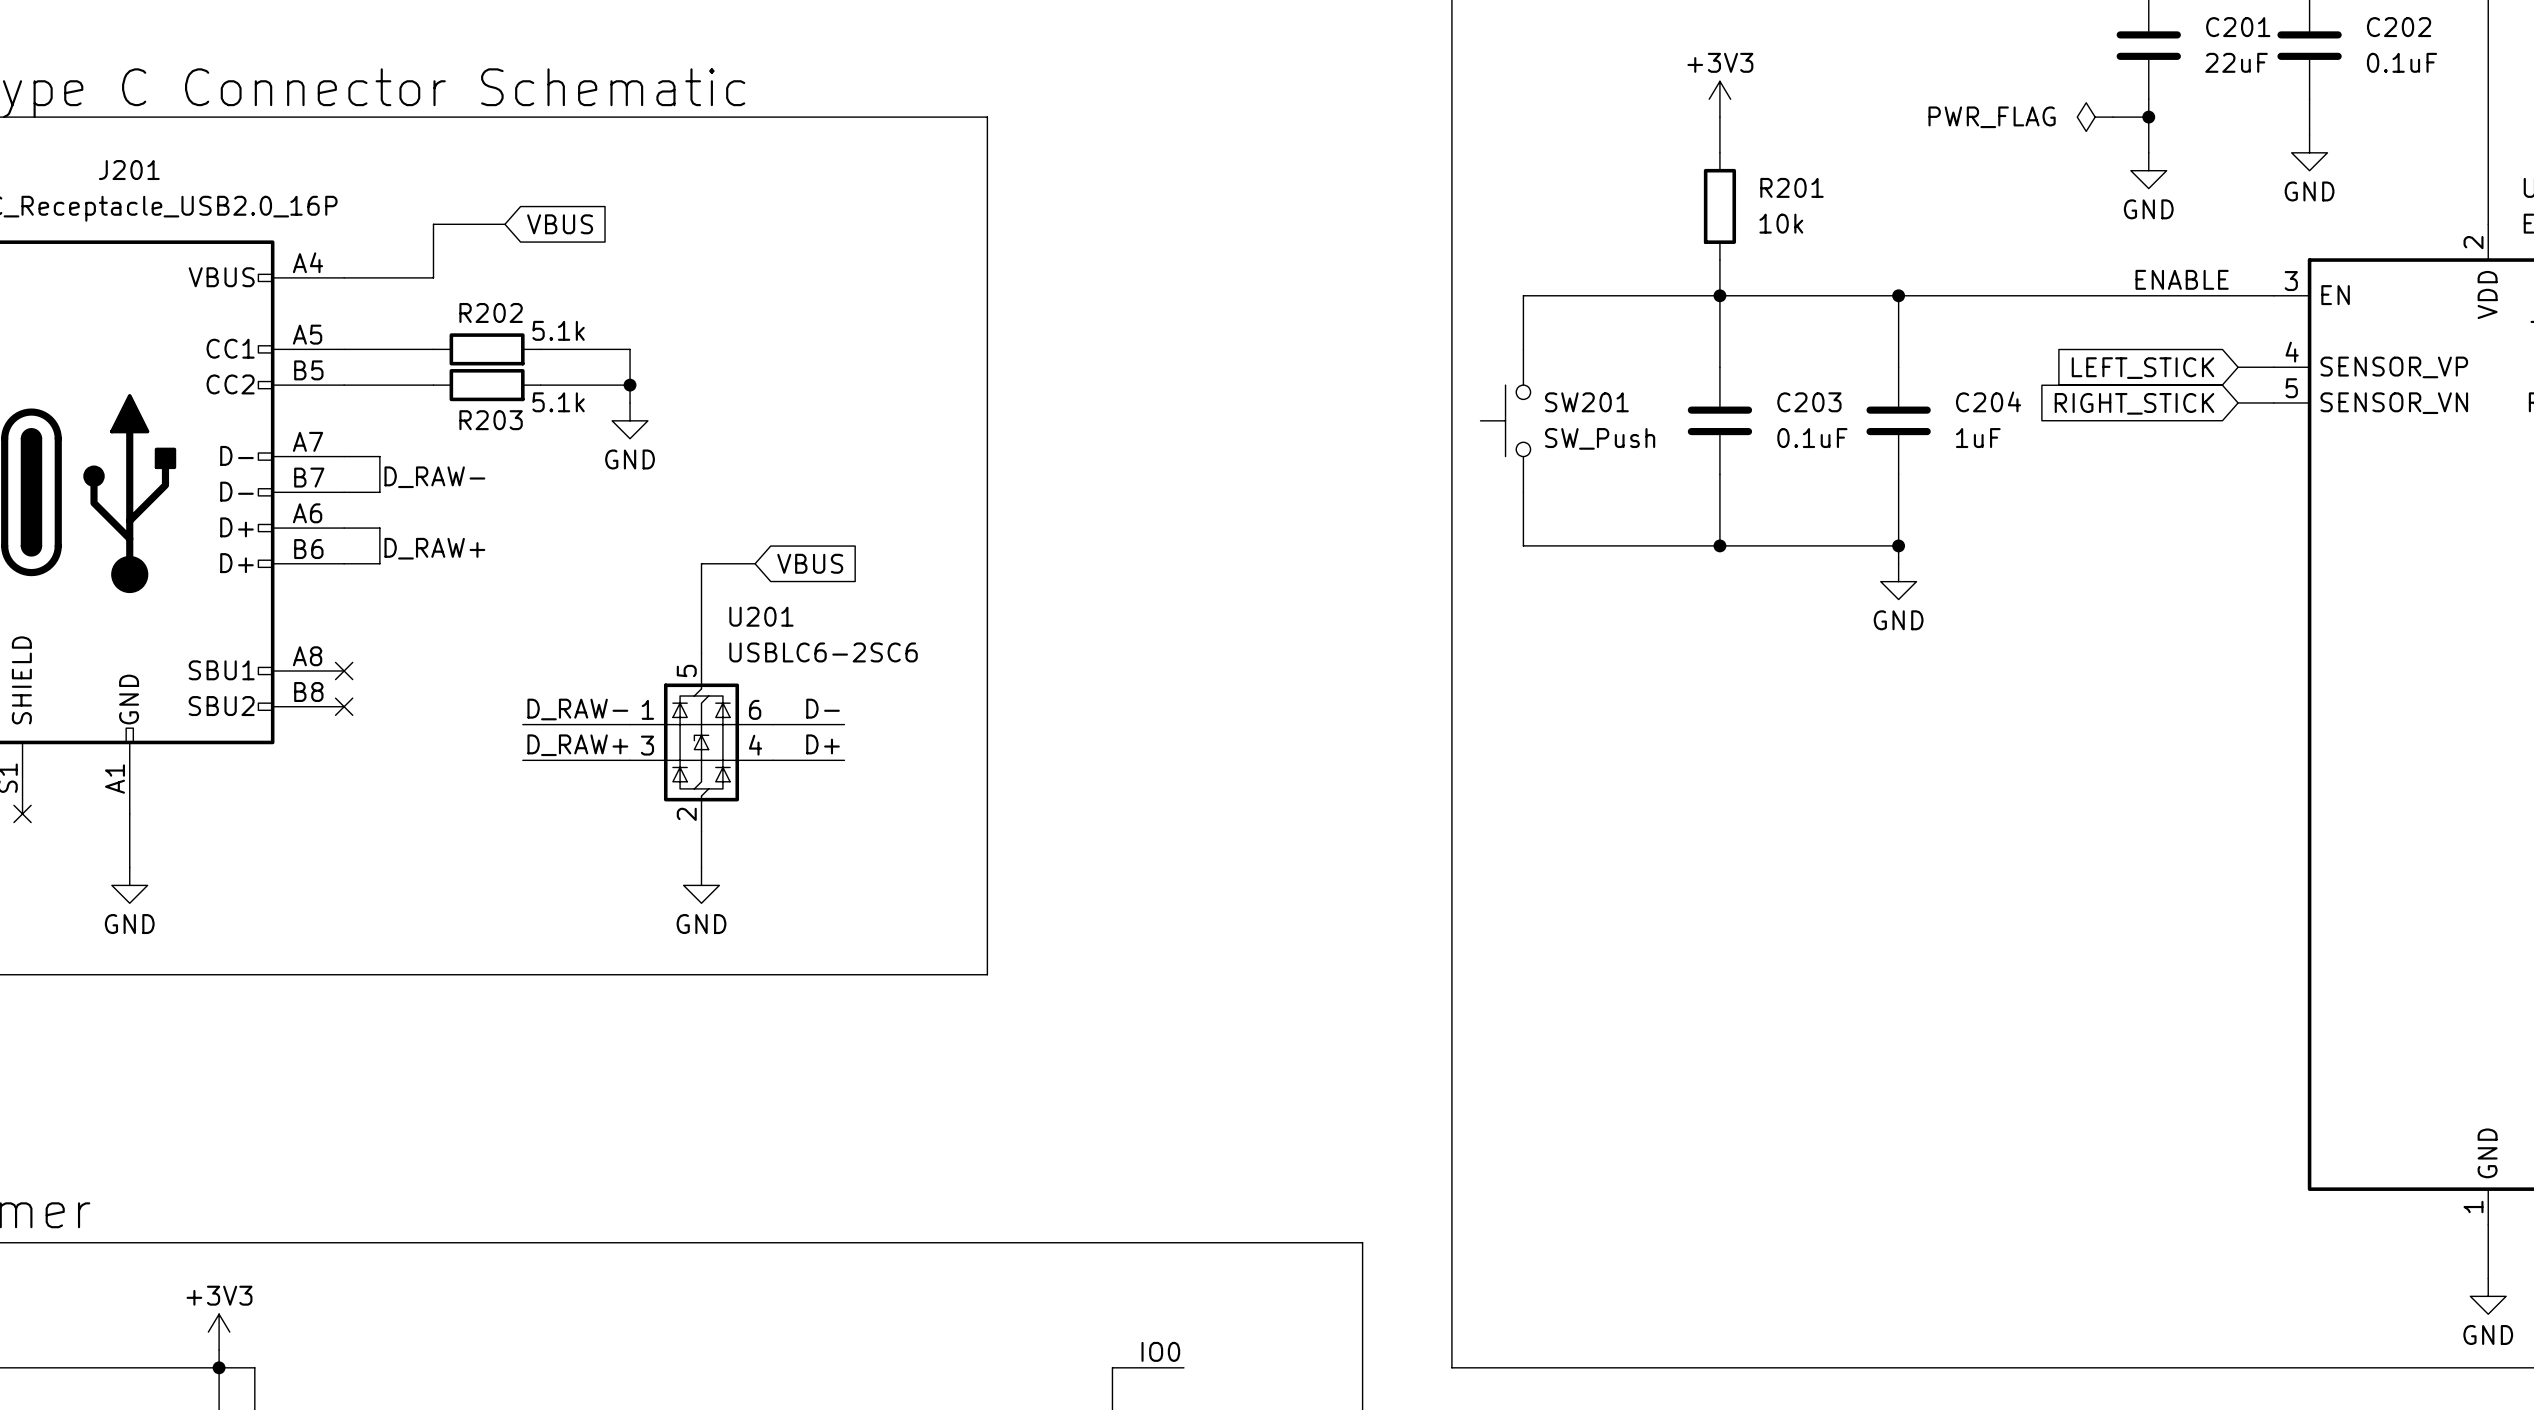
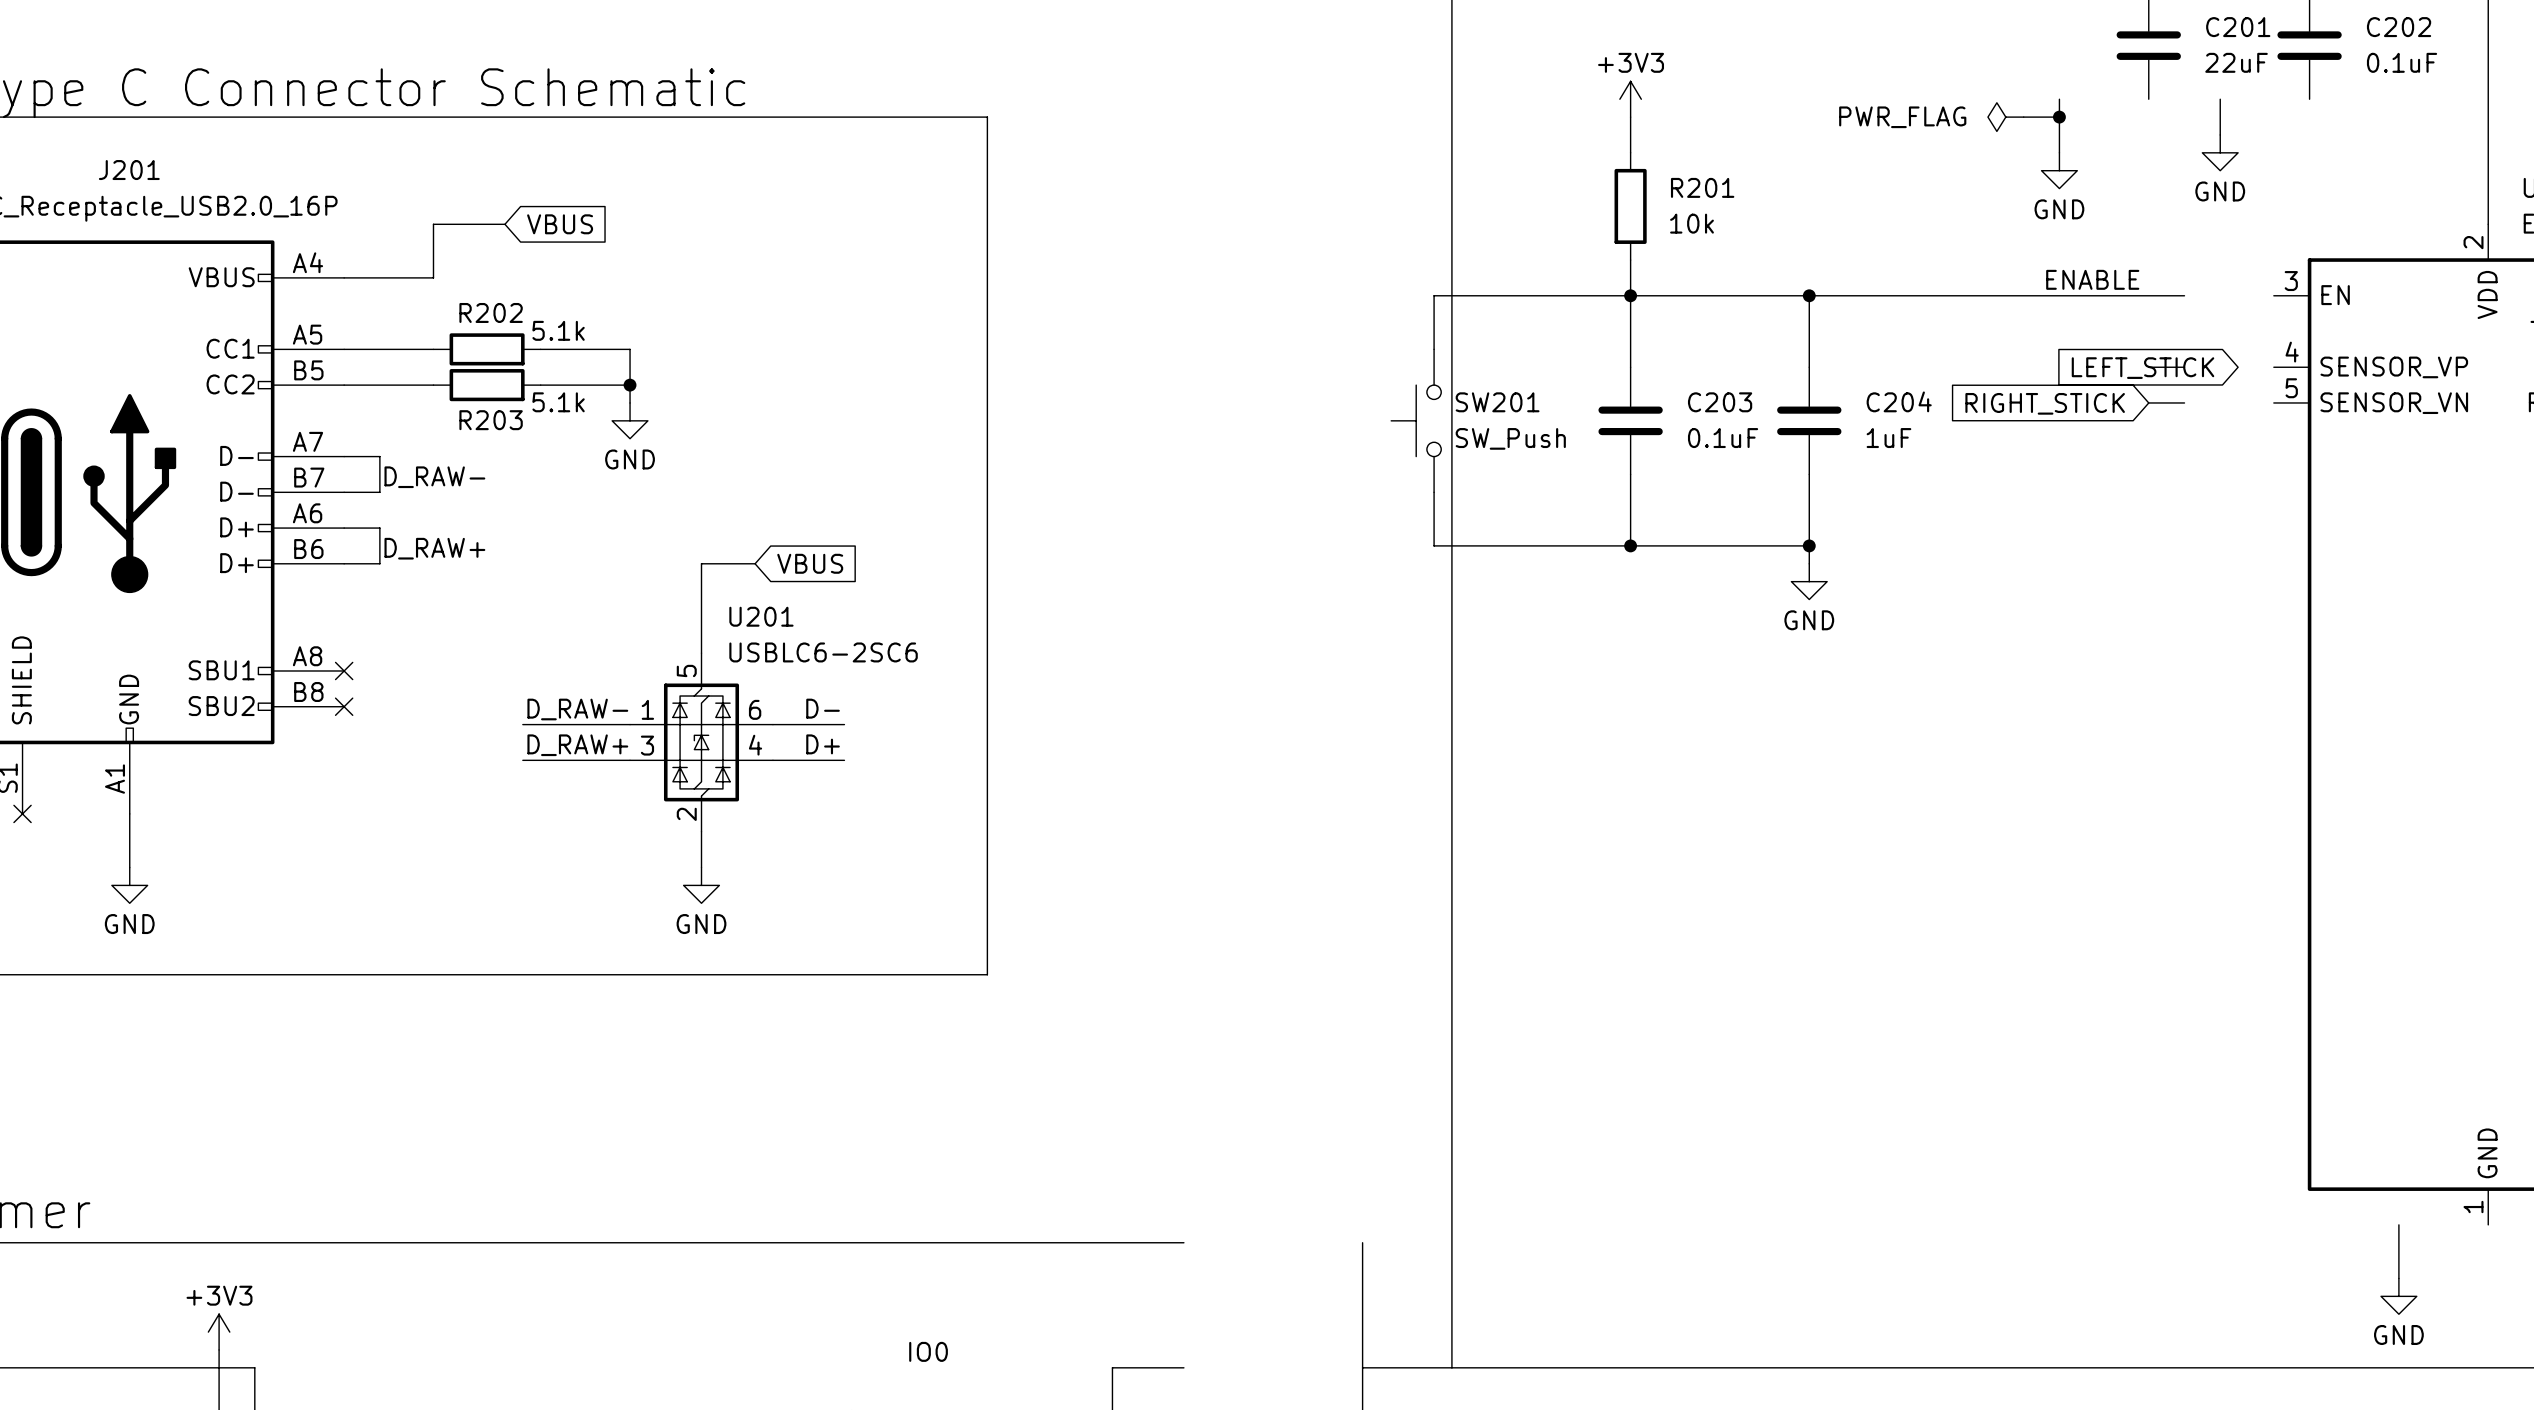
power symbol position: +3V3 (1719, 99) -> +3V3 (1630, 99)
wire: (2148, 99) (2148, 152) -> (2059, 99) (2059, 152)
wire: (2309, 99) (2309, 134) -> (2220, 99) (2220, 134)
wire: (1719, 117) (1719, 152) -> (1630, 117) (1630, 152)
junction: none -> (2059, 117)
power symbol position: PWR_FLAG (2095, 117) -> PWR_FLAG (2005, 117)
wire: (2113, 117) (2148, 117) -> (2023, 117) (2059, 117)
junction: (2148, 117) -> none
power symbol: none -> GND (2220, 152)
power symbol: GND (2309, 152) -> none
power symbol: none -> GND (2059, 170)
power symbol: GND (2148, 170) -> none
R201 position: (1719, 206) -> (1630, 206)
wire: (1719, 260) (1719, 367) -> (1630, 260) (1630, 367)
label position: ENABLE (2182, 279) -> ENABLE (2092, 279)
wire: (1523, 295) (1523, 349) -> (1523, 295) (1434, 295) (1434, 349)
junction: none -> (1630, 295)
junction: (1719, 295) -> none
junction: none -> (1809, 295)
wire: (1898, 295) (1898, 367) -> (1809, 295) (1809, 367)
junction: (1898, 295) -> none
wire: (2184, 295) (2273, 295) -> none
wire: (2238, 367) (2273, 367) -> (2148, 367) (2184, 367)
wire: (2238, 402) (2273, 402) -> (2148, 402) (2184, 402)
global label position: RIGHT_STICK (2134, 403) -> RIGHT_STICK (2045, 403)
SW201 position: (1505, 420) -> (1416, 420)
C203 position: (1719, 420) -> (1630, 420)
C204 position: (1898, 420) -> (1809, 420)
wire: (1719, 474) (1719, 545) -> (1630, 474) (1630, 545)
wire: (1898, 474) (1898, 563) -> (1809, 474) (1809, 563)
wire: (1523, 492) (1523, 545) -> (1434, 492) (1434, 545) (1523, 545)
junction: none -> (1630, 545)
junction: (1719, 545) -> none
wire: (1809, 545) (1898, 545) -> none
junction: none -> (1809, 545)
junction: (1898, 545) -> none
power symbol position: GND (1898, 581) -> GND (1809, 581)
wire: (2488, 1224) (2488, 1278) -> (2398, 1224) (2398, 1278)
line: (1183, 1242) (1362, 1242) -> none
power symbol position: GND (2488, 1296) -> GND (2398, 1296)
label position: IO0 (1160, 1351) -> IO0 (928, 1351)
junction: (219, 1367) -> none
line: none -> (1362, 1367) (1451, 1367)

